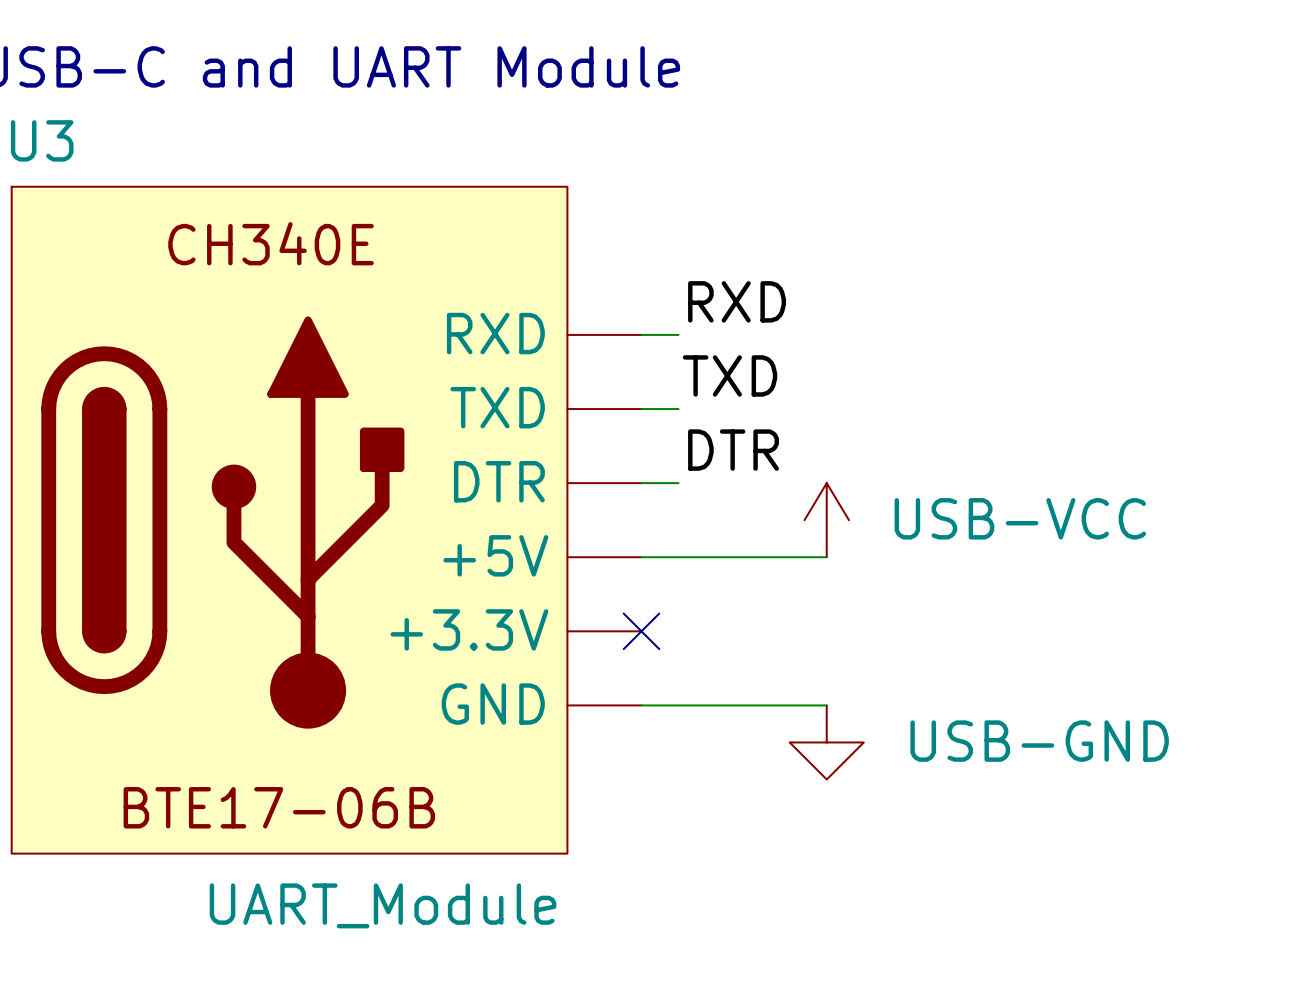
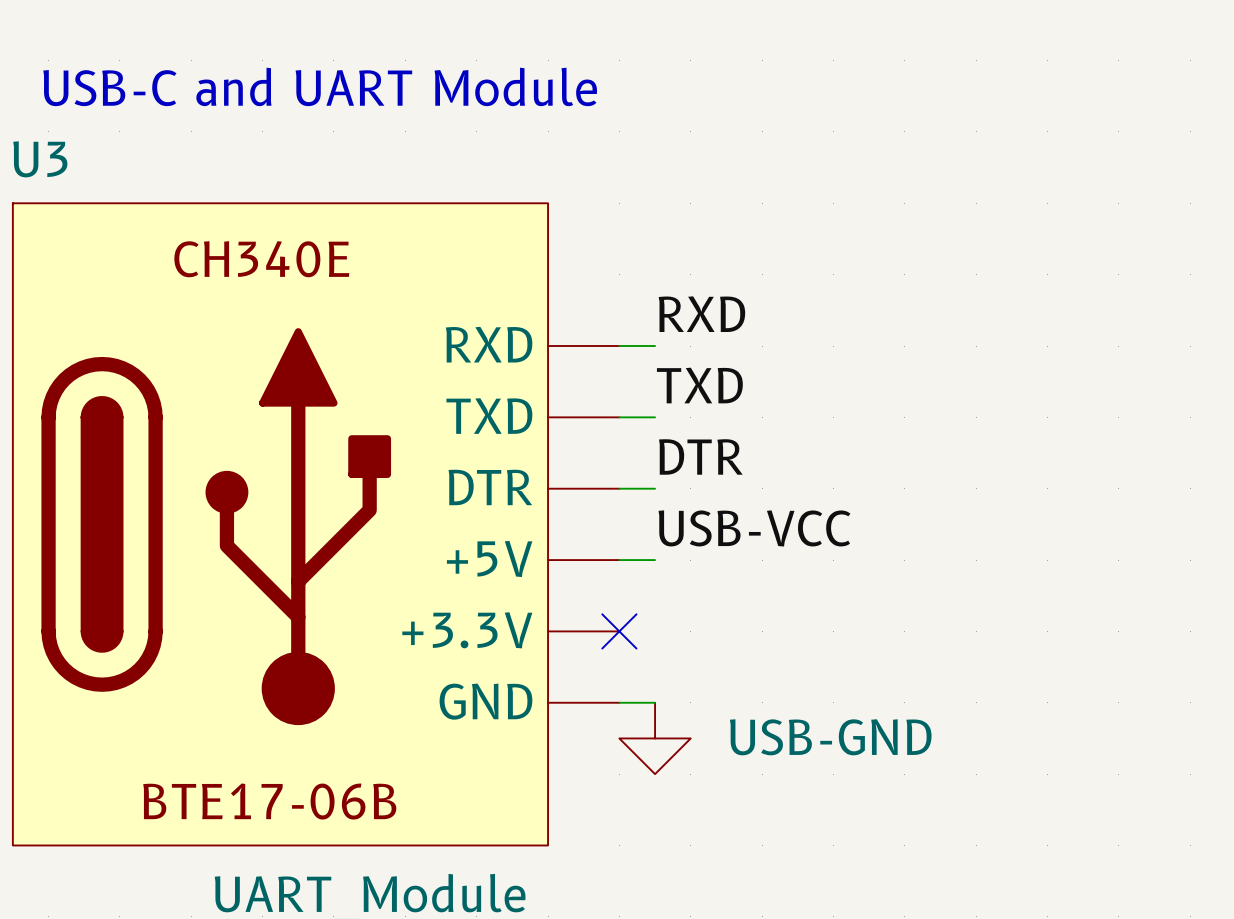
power symbol: USB-VCC (826, 520) -> none
label: none -> USB-VCC (754, 528)
wire: (678, 557) (826, 557) -> none
wire: (678, 705) (826, 705) -> none
power symbol position: USB-GND (826, 742) -> USB-GND (655, 738)

